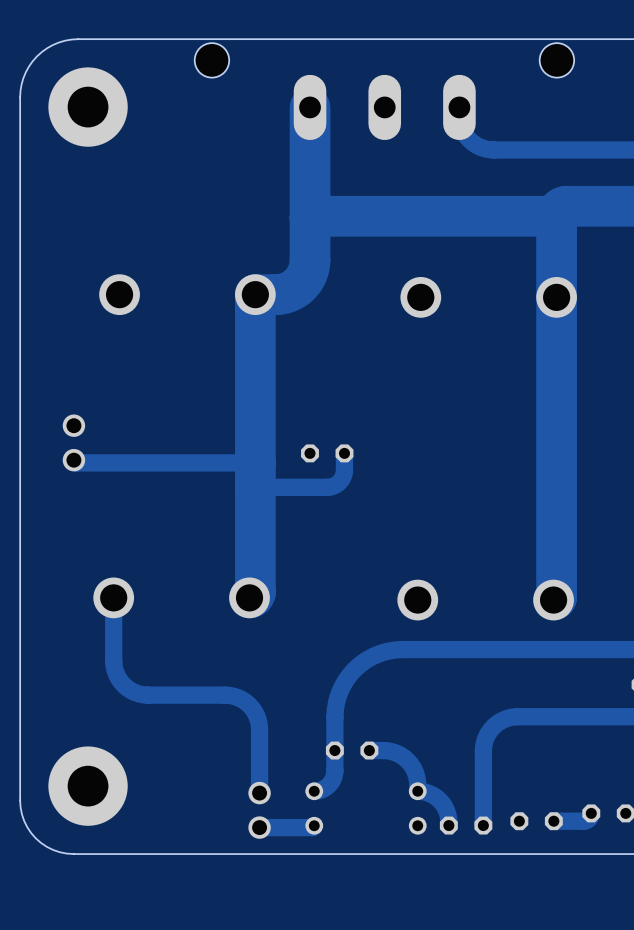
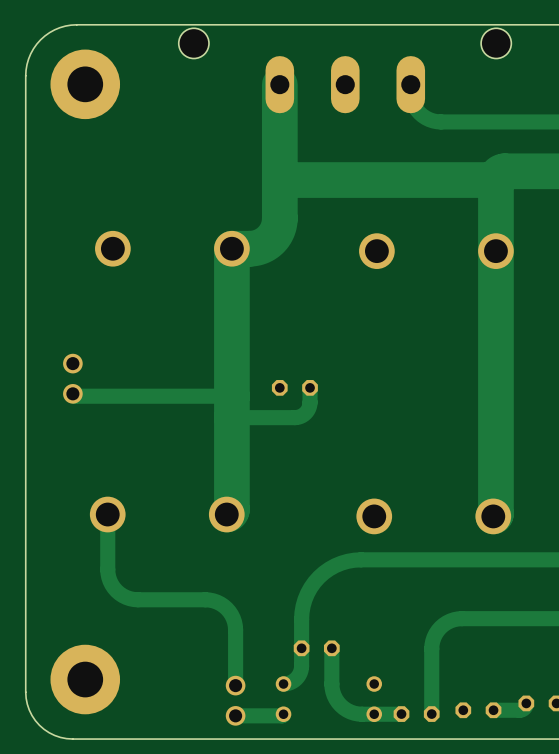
track: (369, 750) (392, 751) (407, 760) (416, 776) (417, 791) (429, 793) (439, 800) (446, 810) (448, 825) -> (331, 648) (332, 687) (334, 695) (340, 705) (346, 710) (358, 713) (401, 714)

